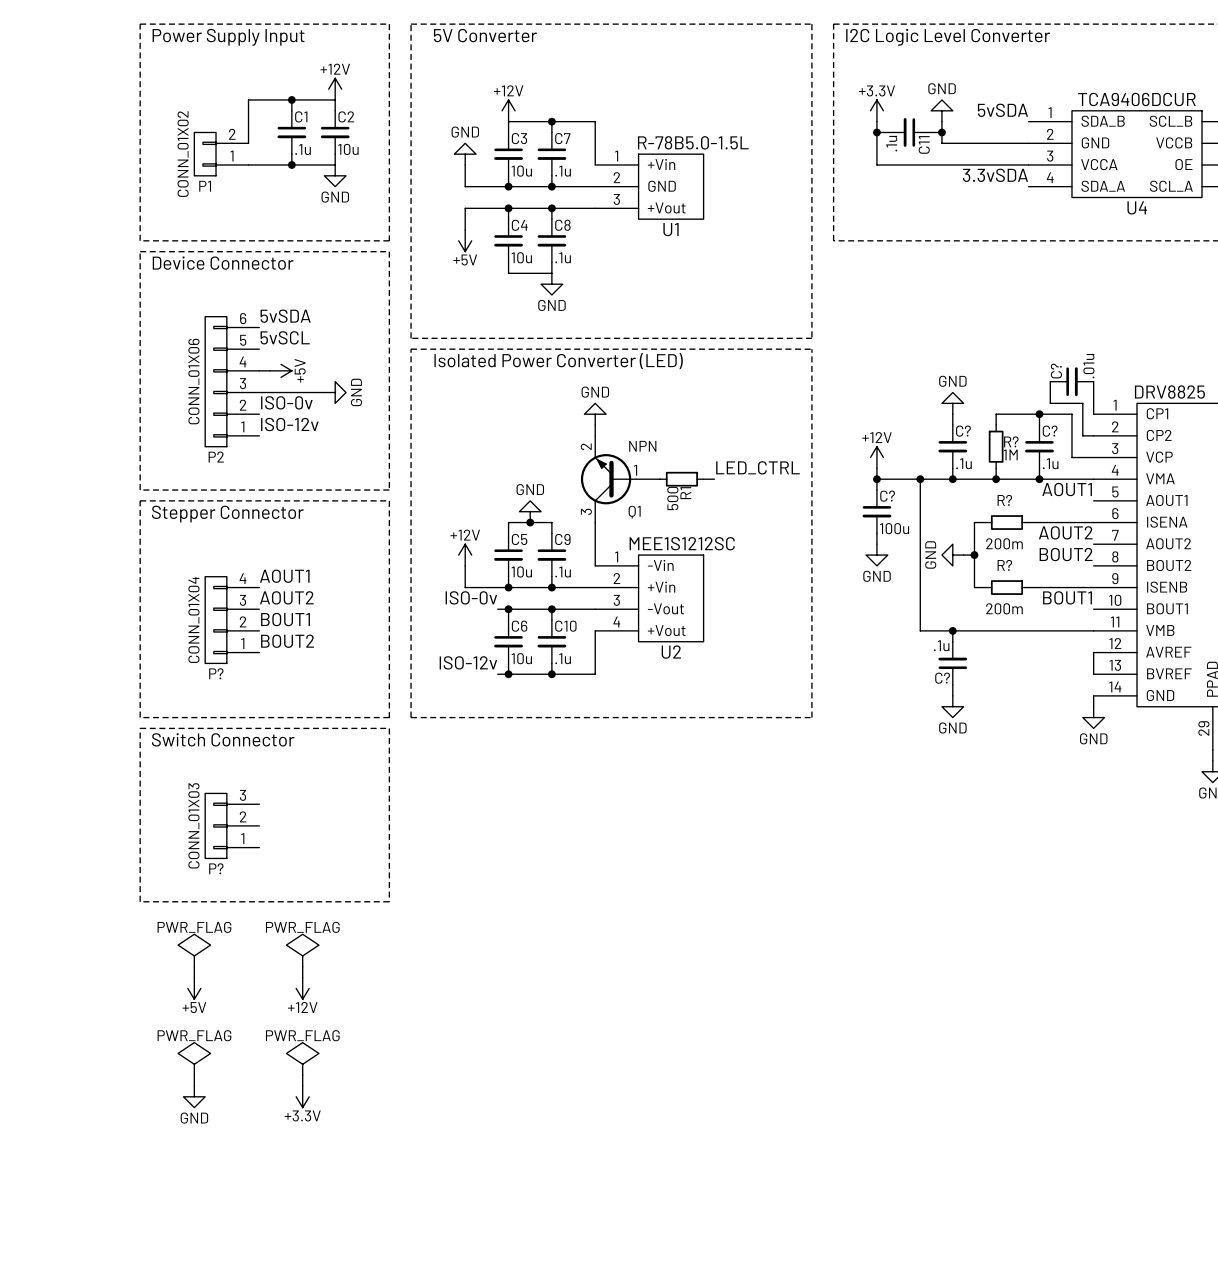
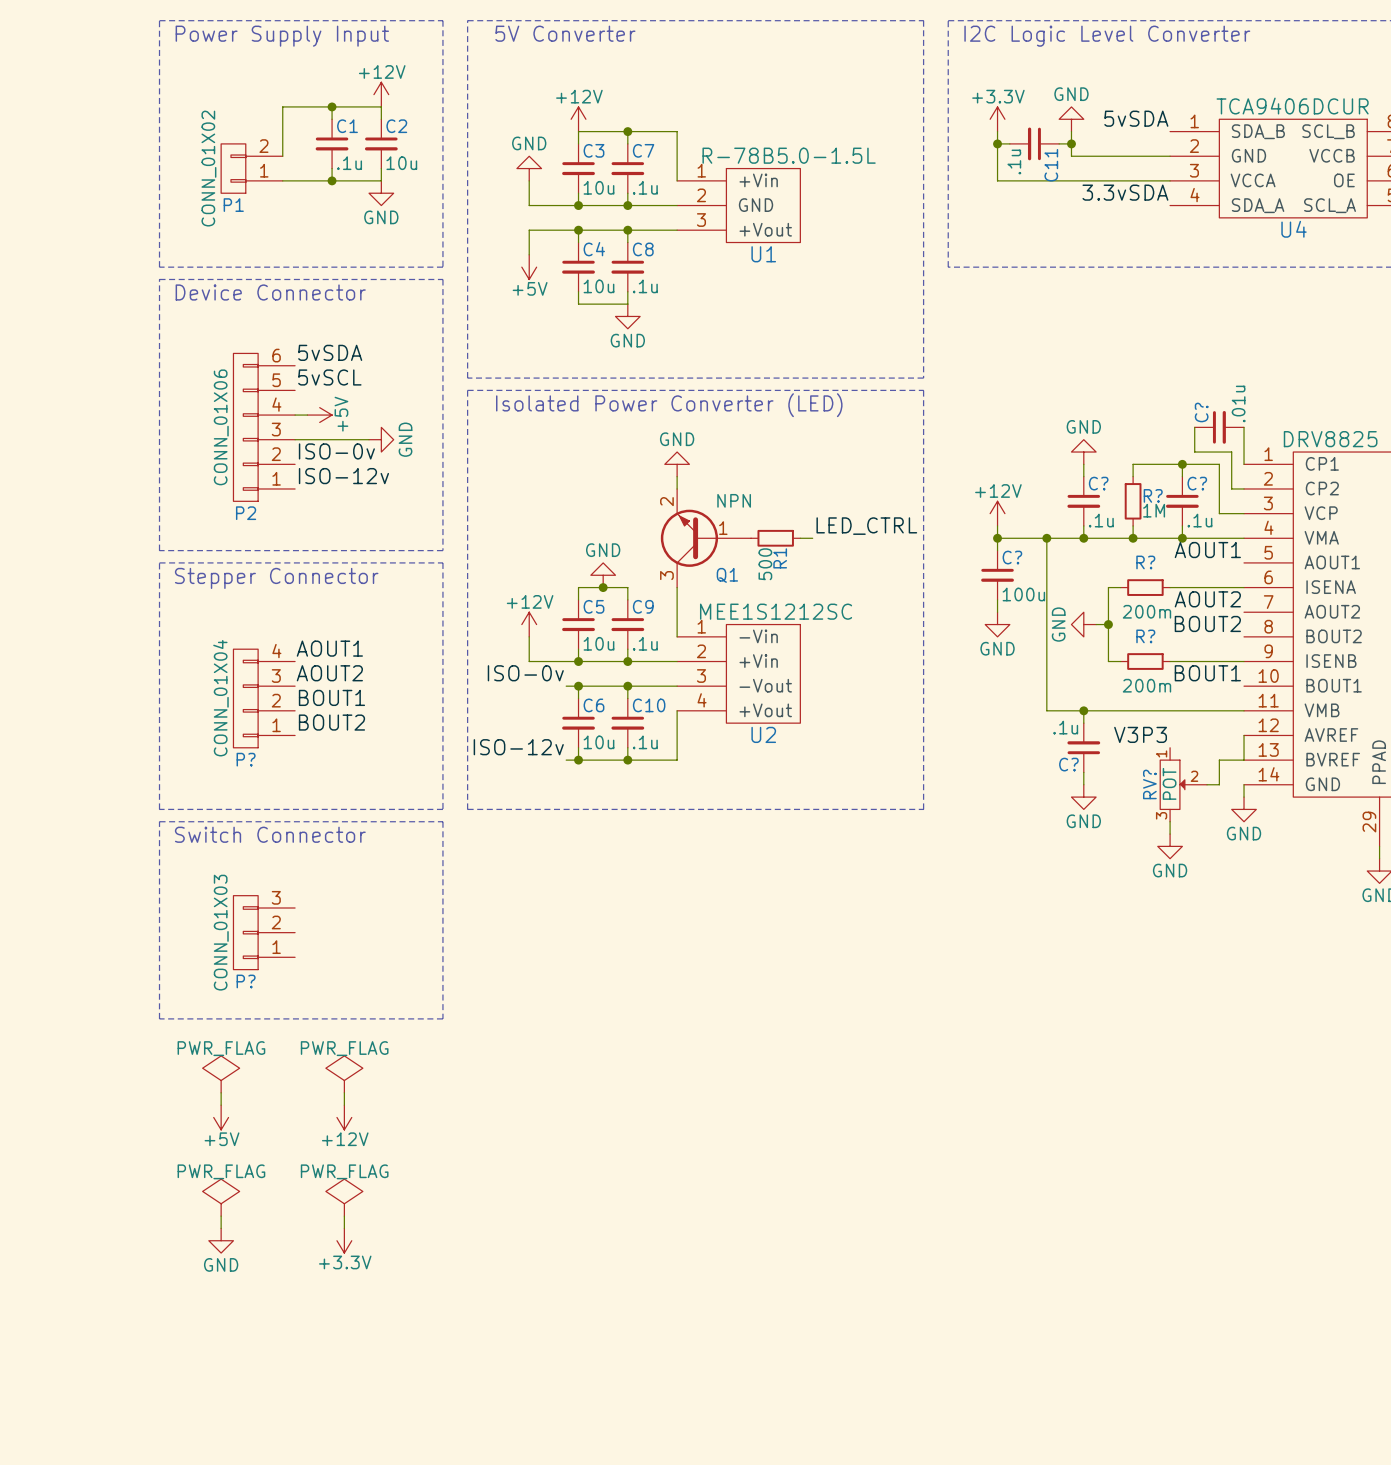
label: none -> V3P3 (1140, 734)
wire: none -> (1244, 760) (1219, 760) (1219, 784) (1207, 784)
RV?: none -> POT (1183, 784)
wire: none -> (1170, 821) (1170, 834)
power symbol: none -> GND (1170, 846)

